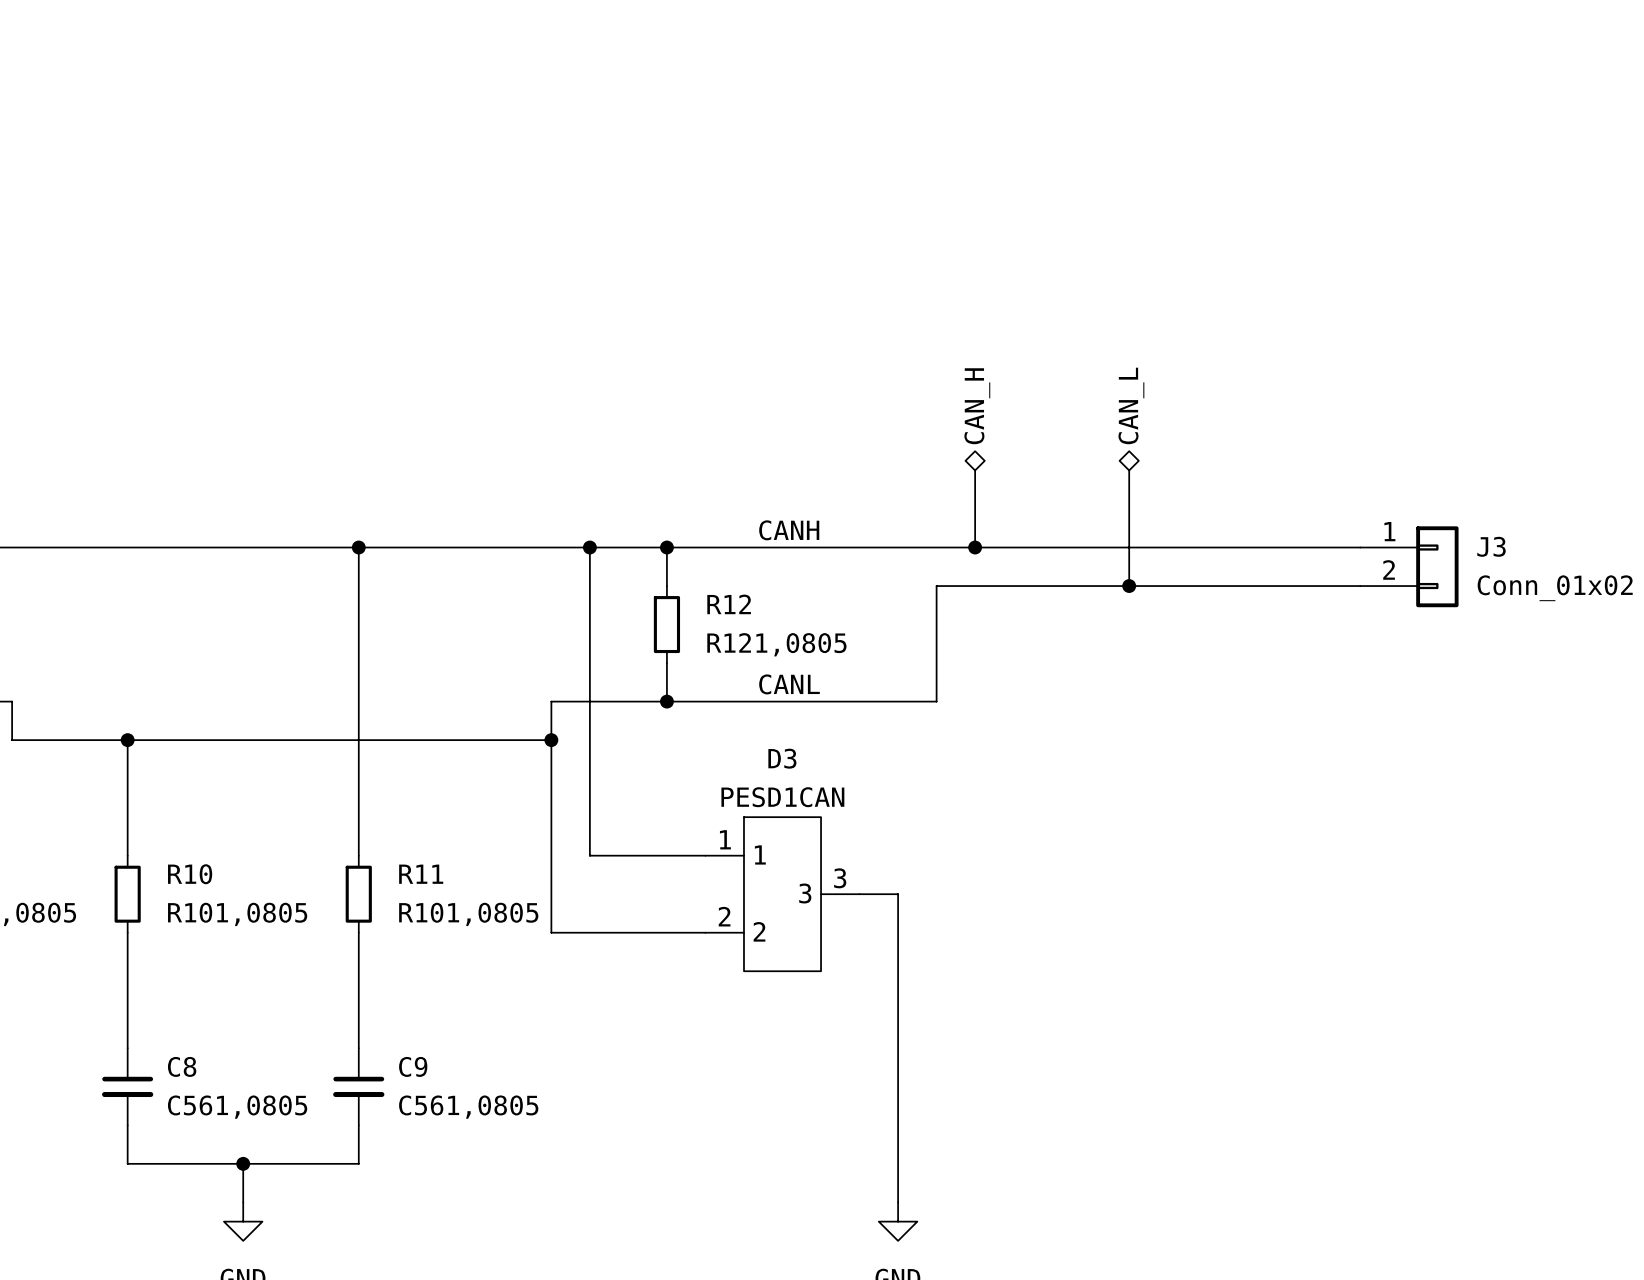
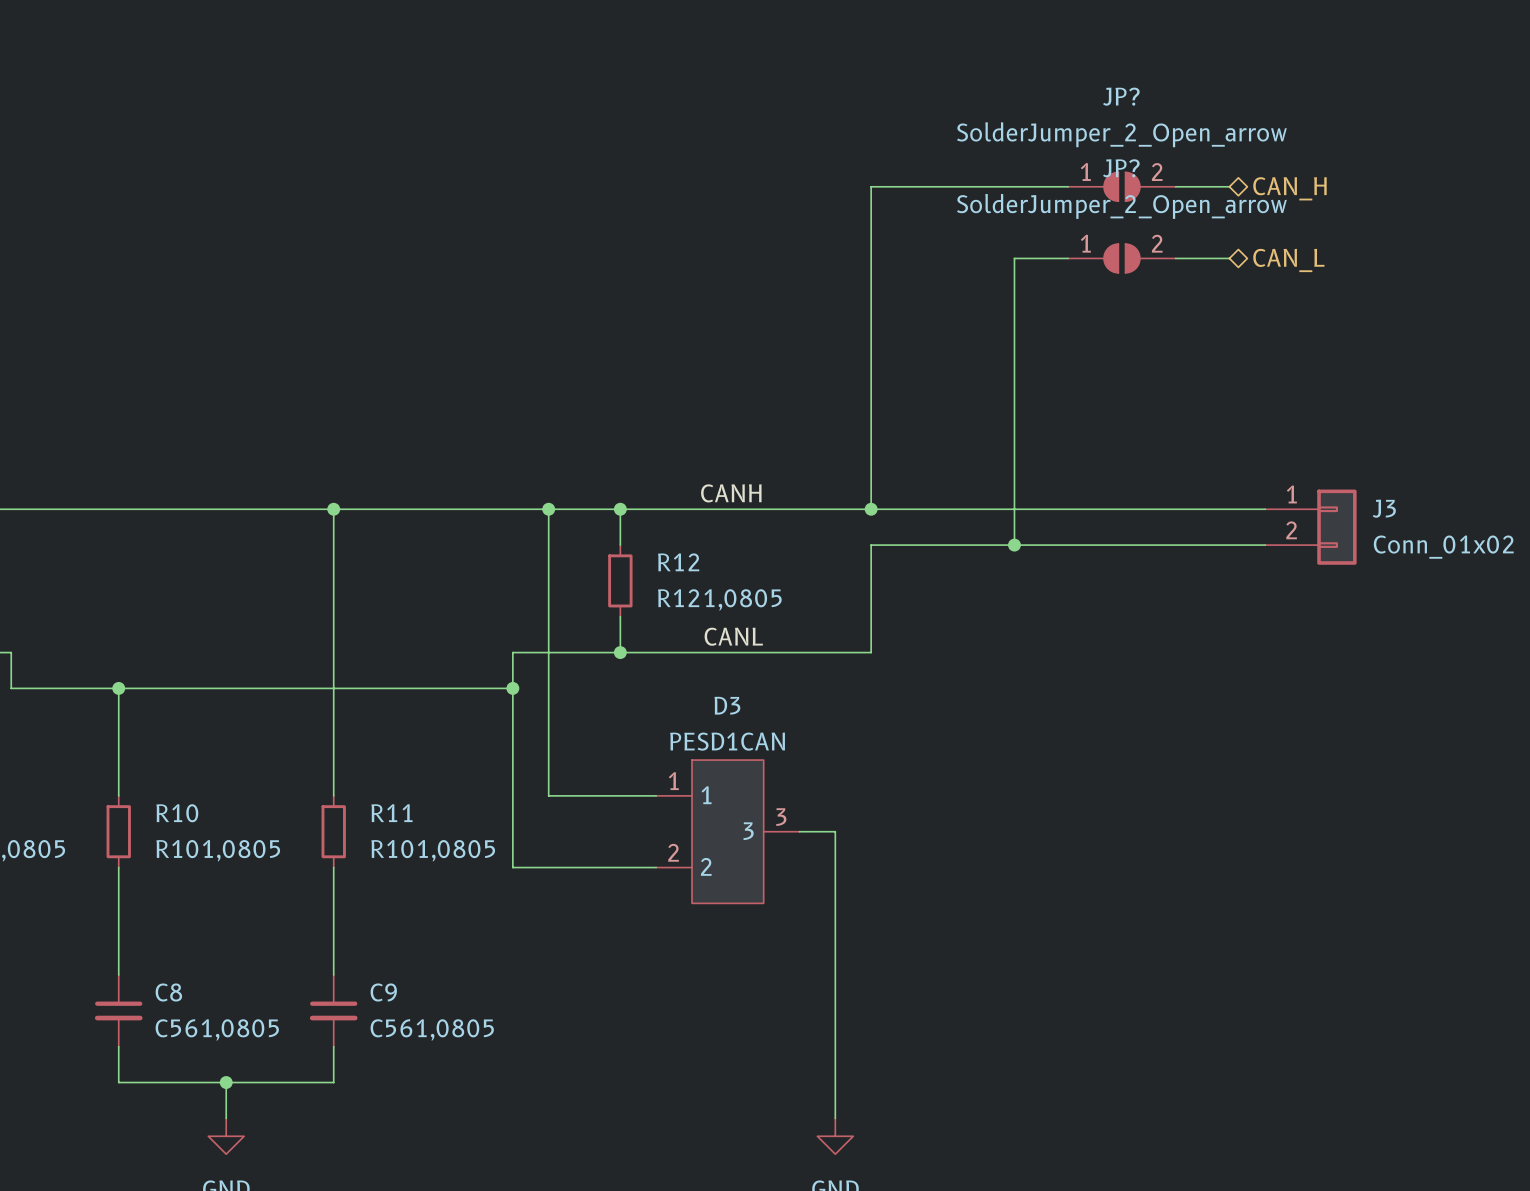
wire: none -> (1068, 186) (871, 186) (871, 509)
JP?: none -> SolderJumper_2_Open_arrow (1121, 186)
wire: none -> (1175, 186) (1229, 186)
hierarchical label: none -> CAN_H (1289, 188)
wire: none -> (1068, 258) (1014, 258) (1014, 545)
JP?: none -> SolderJumper_2_Open_arrow (1121, 258)
wire: none -> (1175, 258) (1229, 258)
hierarchical label rotation: 0° (1131, 405) -> 90° clockwise (1288, 260)
hierarchical label position: CAN_L (1131, 405) -> CAN_L (1288, 260)
hierarchical label: CAN_H (977, 406) -> none
wire: (975, 470) (975, 547) -> none
wire: (1129, 470) (1129, 586) -> none
junction position: (975, 547) -> (871, 509)
junction position: (1129, 586) -> (1014, 545)

